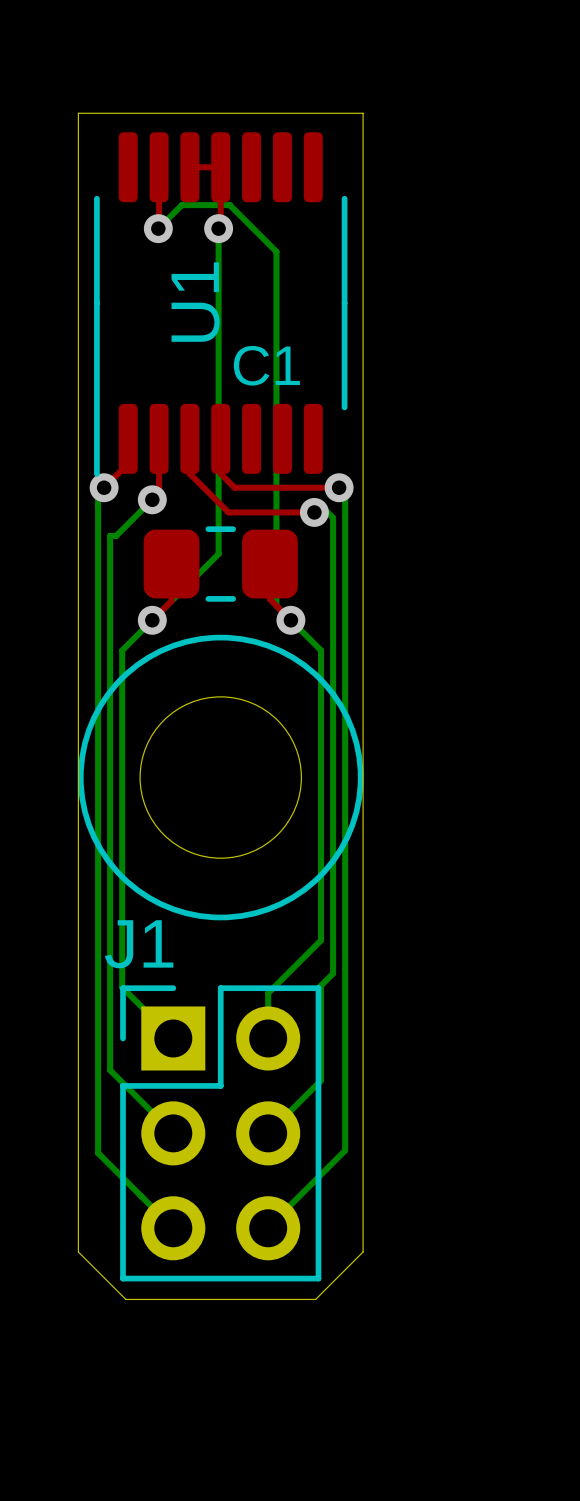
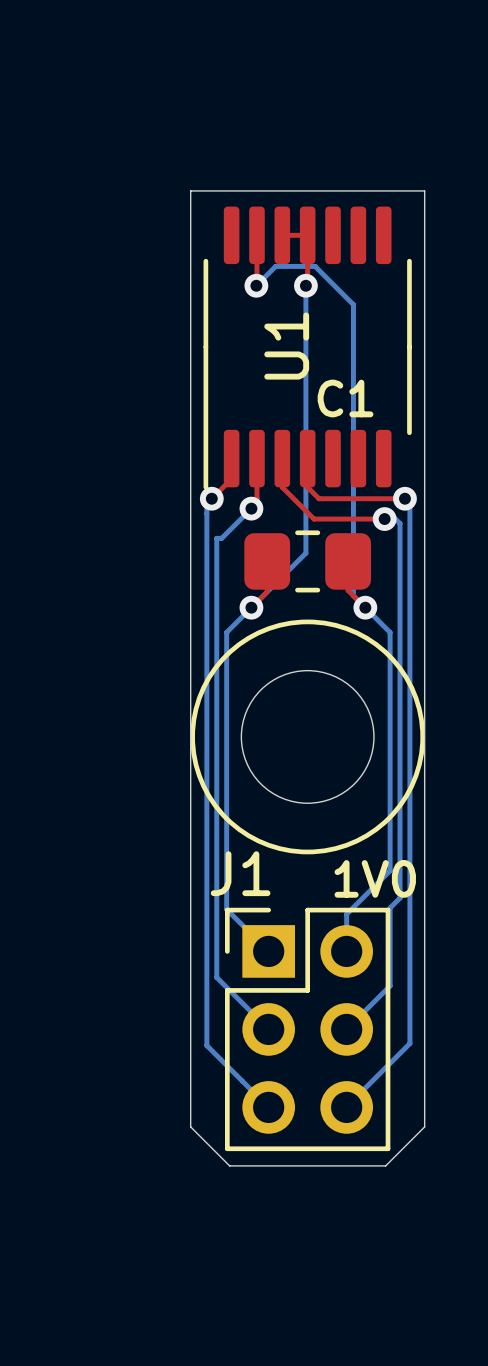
text: none -> 1V0 (375, 878)

